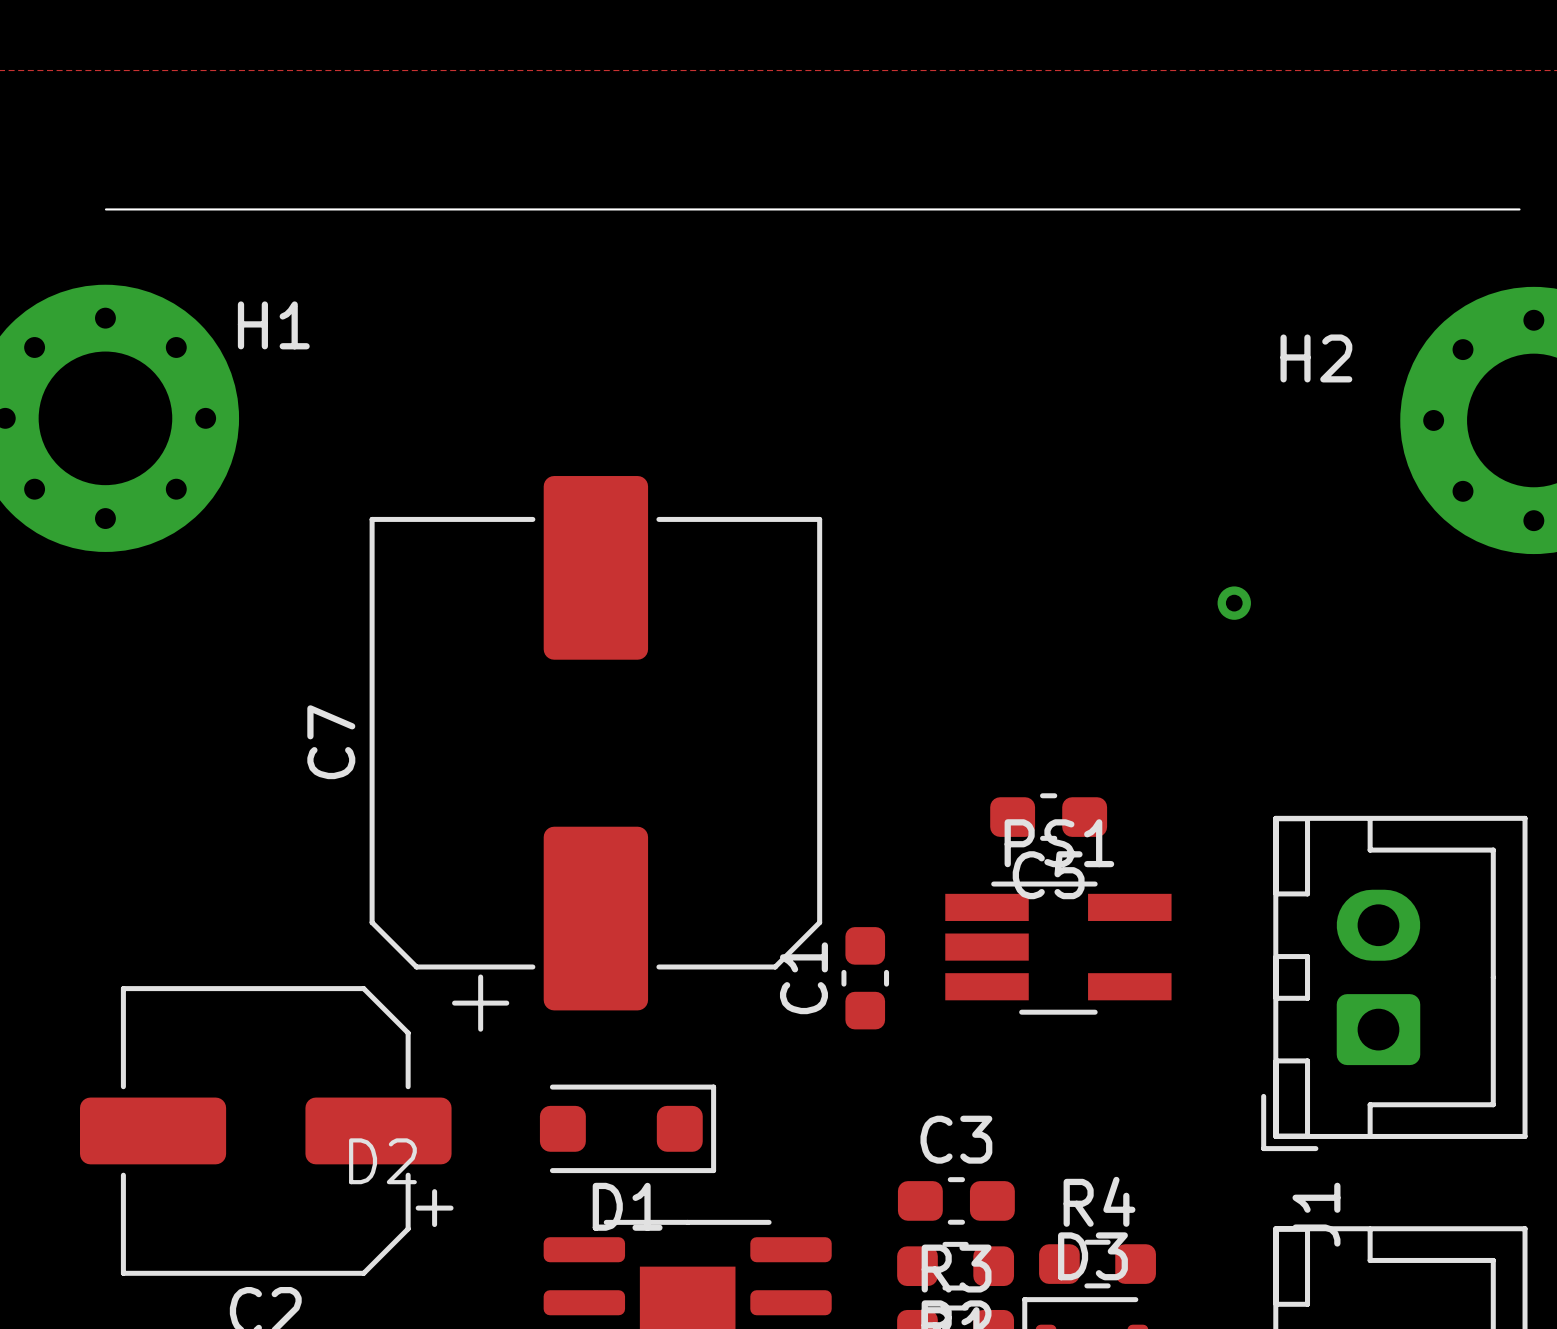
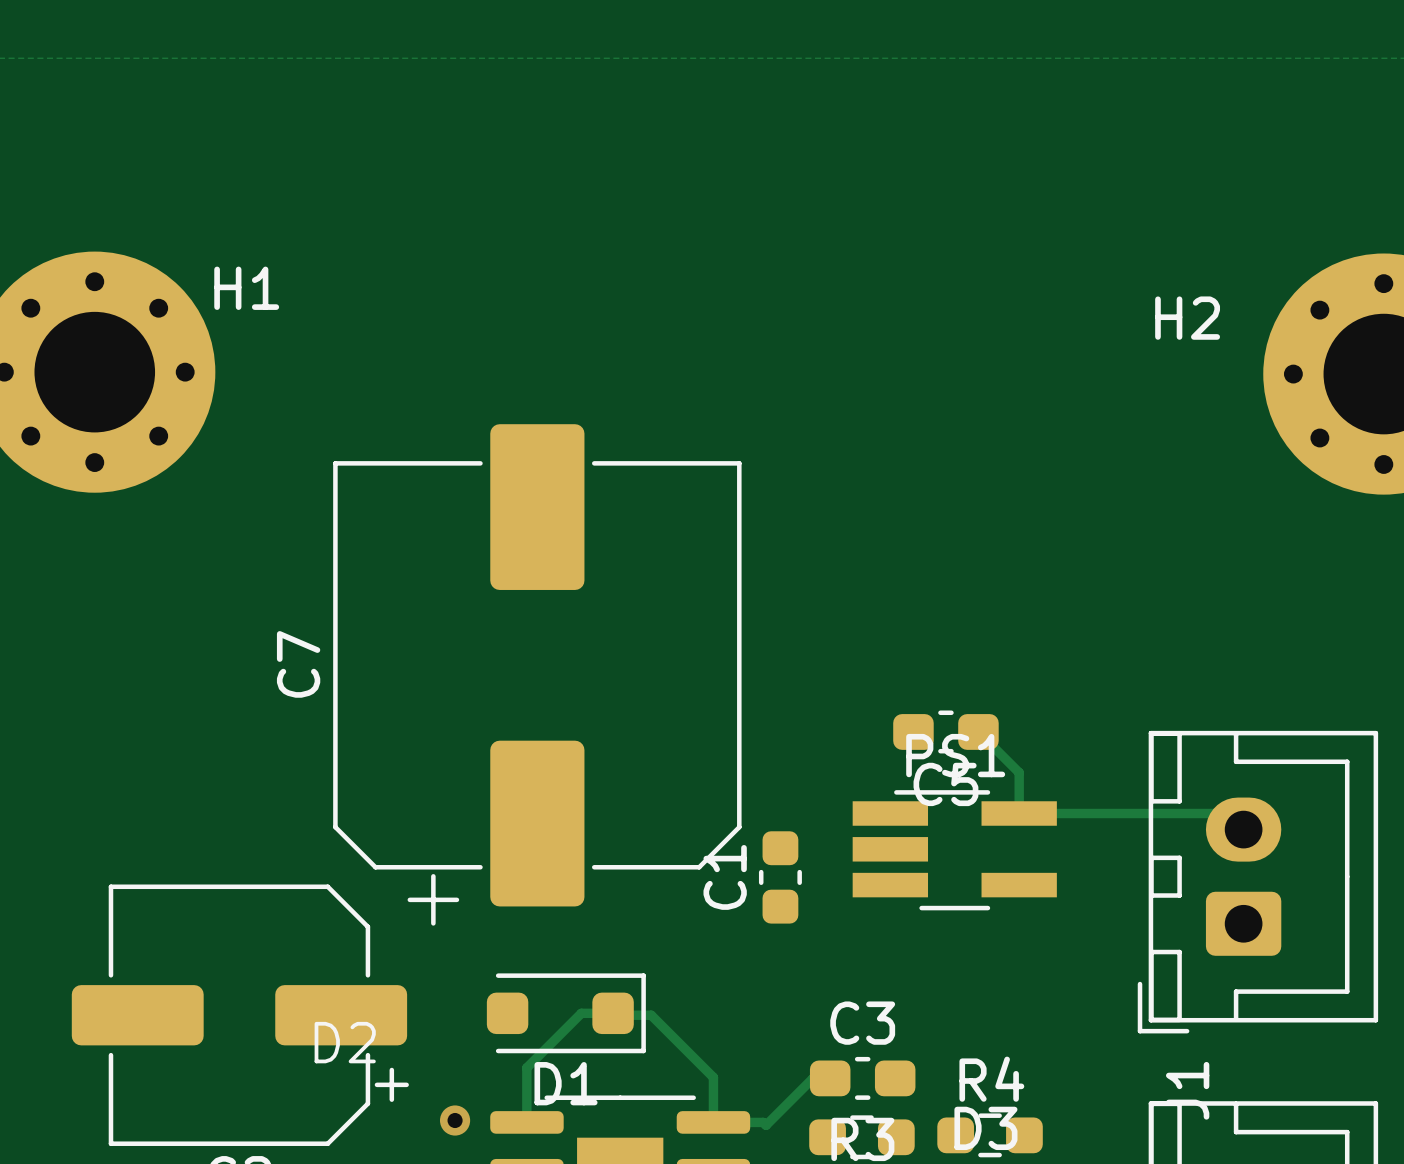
board edge: (105, 209) (1519, 209) -> none
via: (1234, 603) -> none
track: none -> (978, 731) (1019, 772) (1019, 813) (1227, 813) (1243, 829)
track: none -> (830, 1078) (812, 1078) (766, 1125) (763, 1122) (713, 1122) (713, 1077) (651, 1015) (581, 1013) (526, 1067) (526, 1122)
via: none -> (455, 1120)

